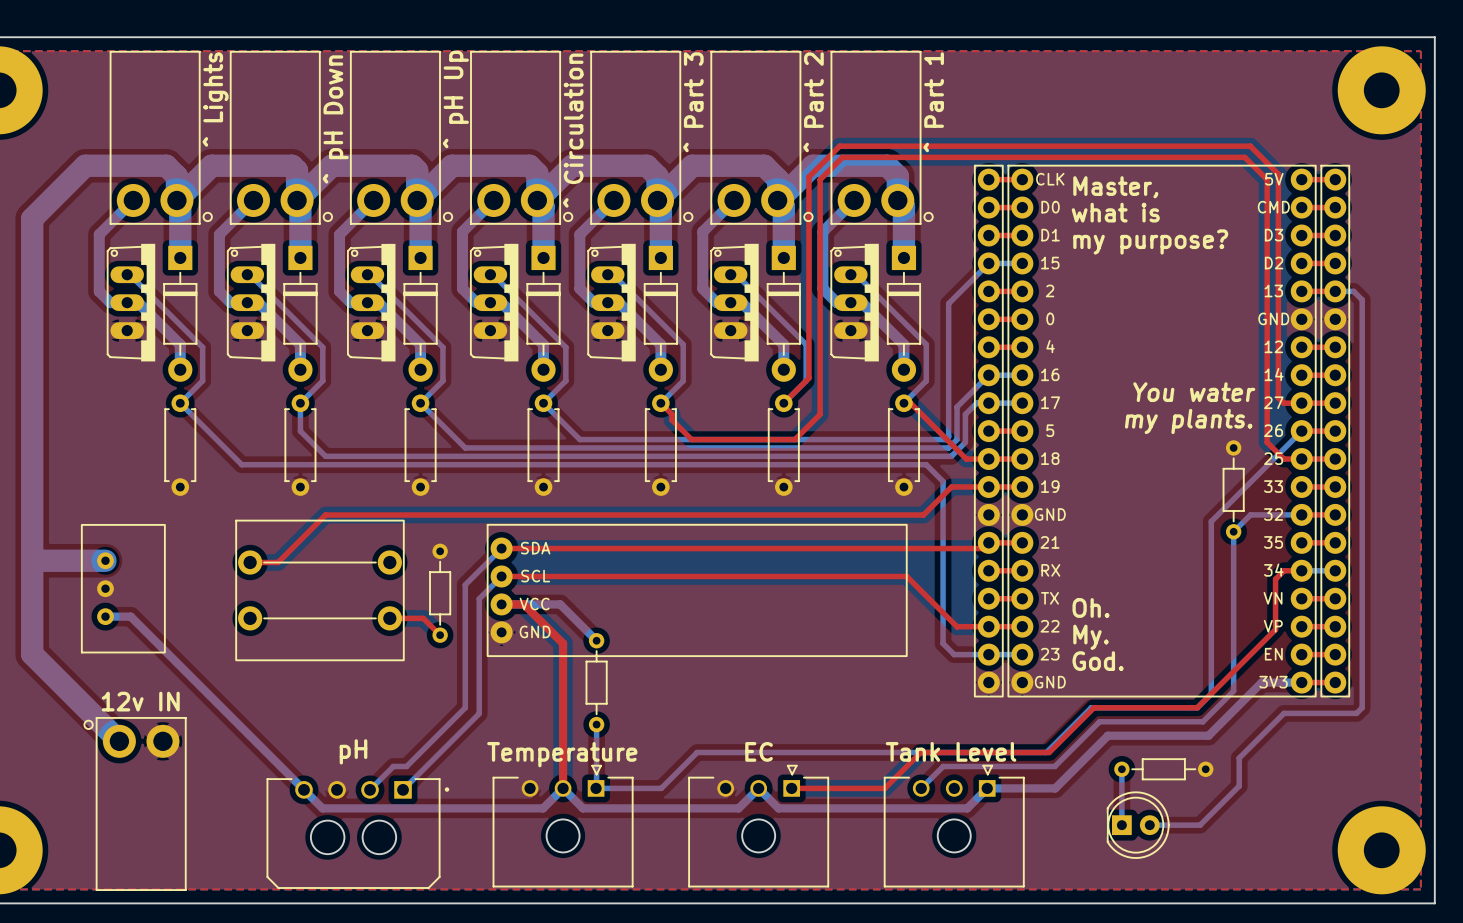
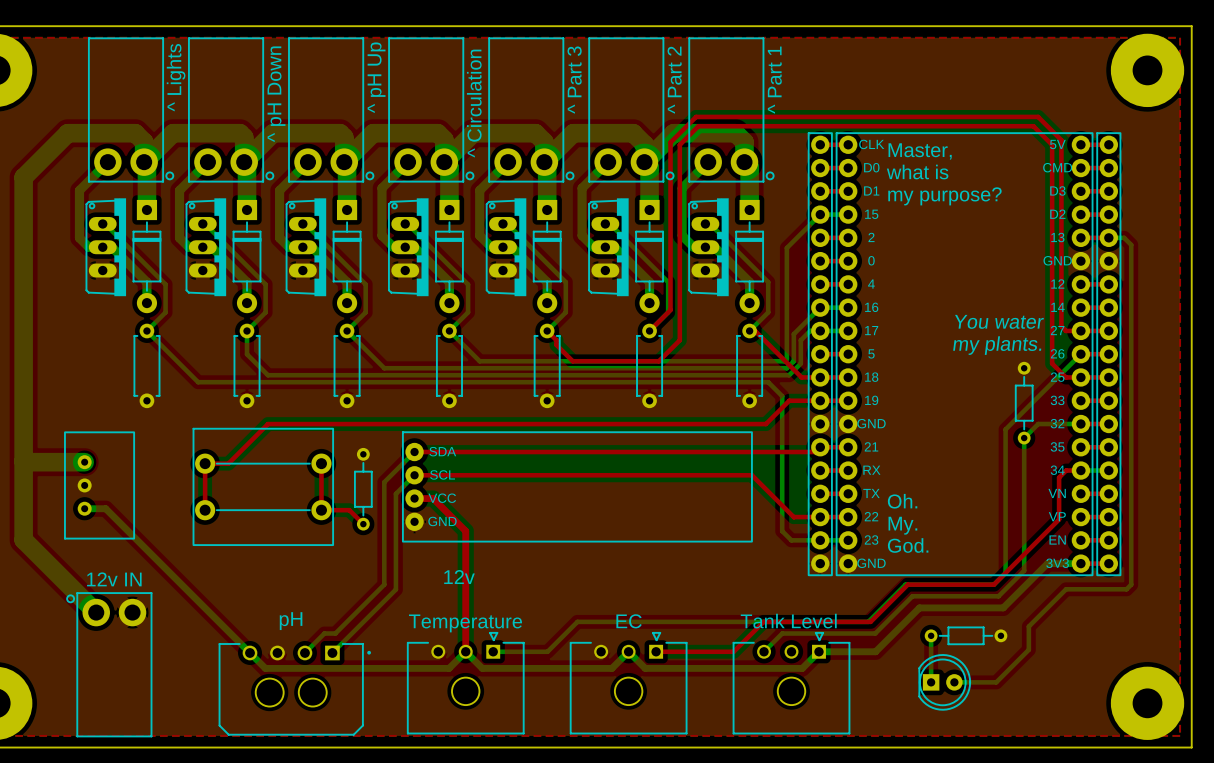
top track: none -> (205, 463) (205, 510)
top track: none -> (321, 463) (321, 510)
bottom track: (501, 604) (560, 604) (596, 640) -> none
part: (596, 682) -> none
text: none -> 12v (459, 577)
bottom track: (596, 724) (596, 788) -> none

